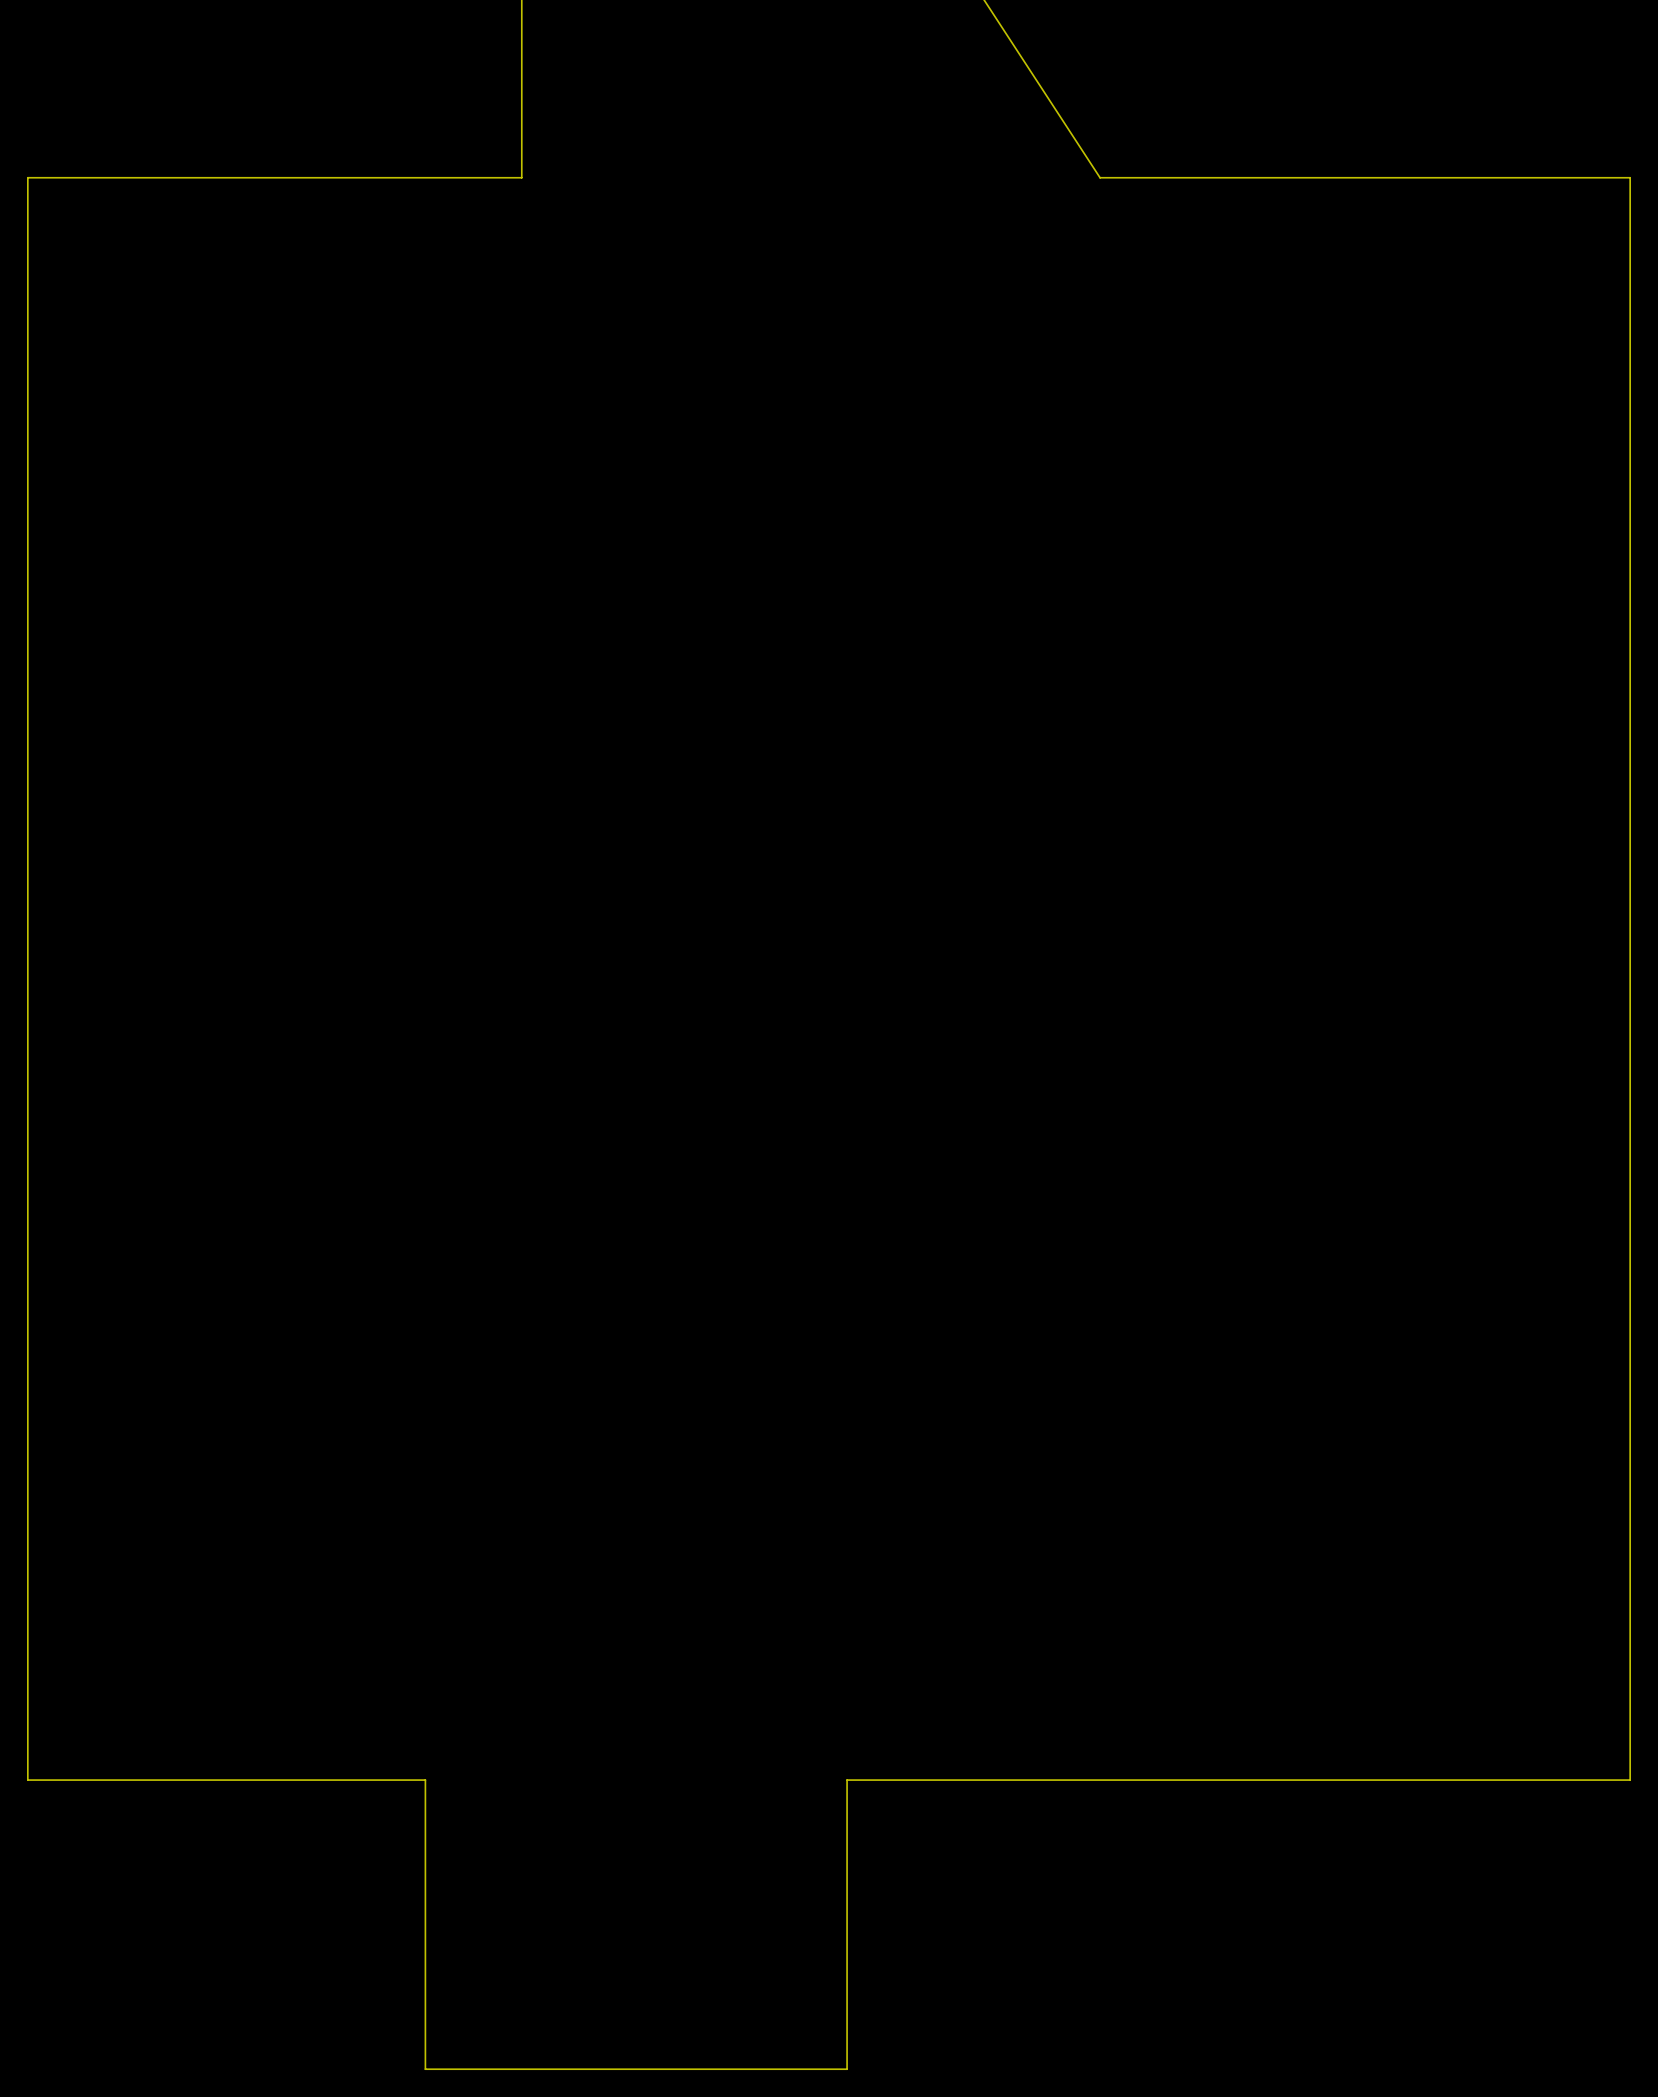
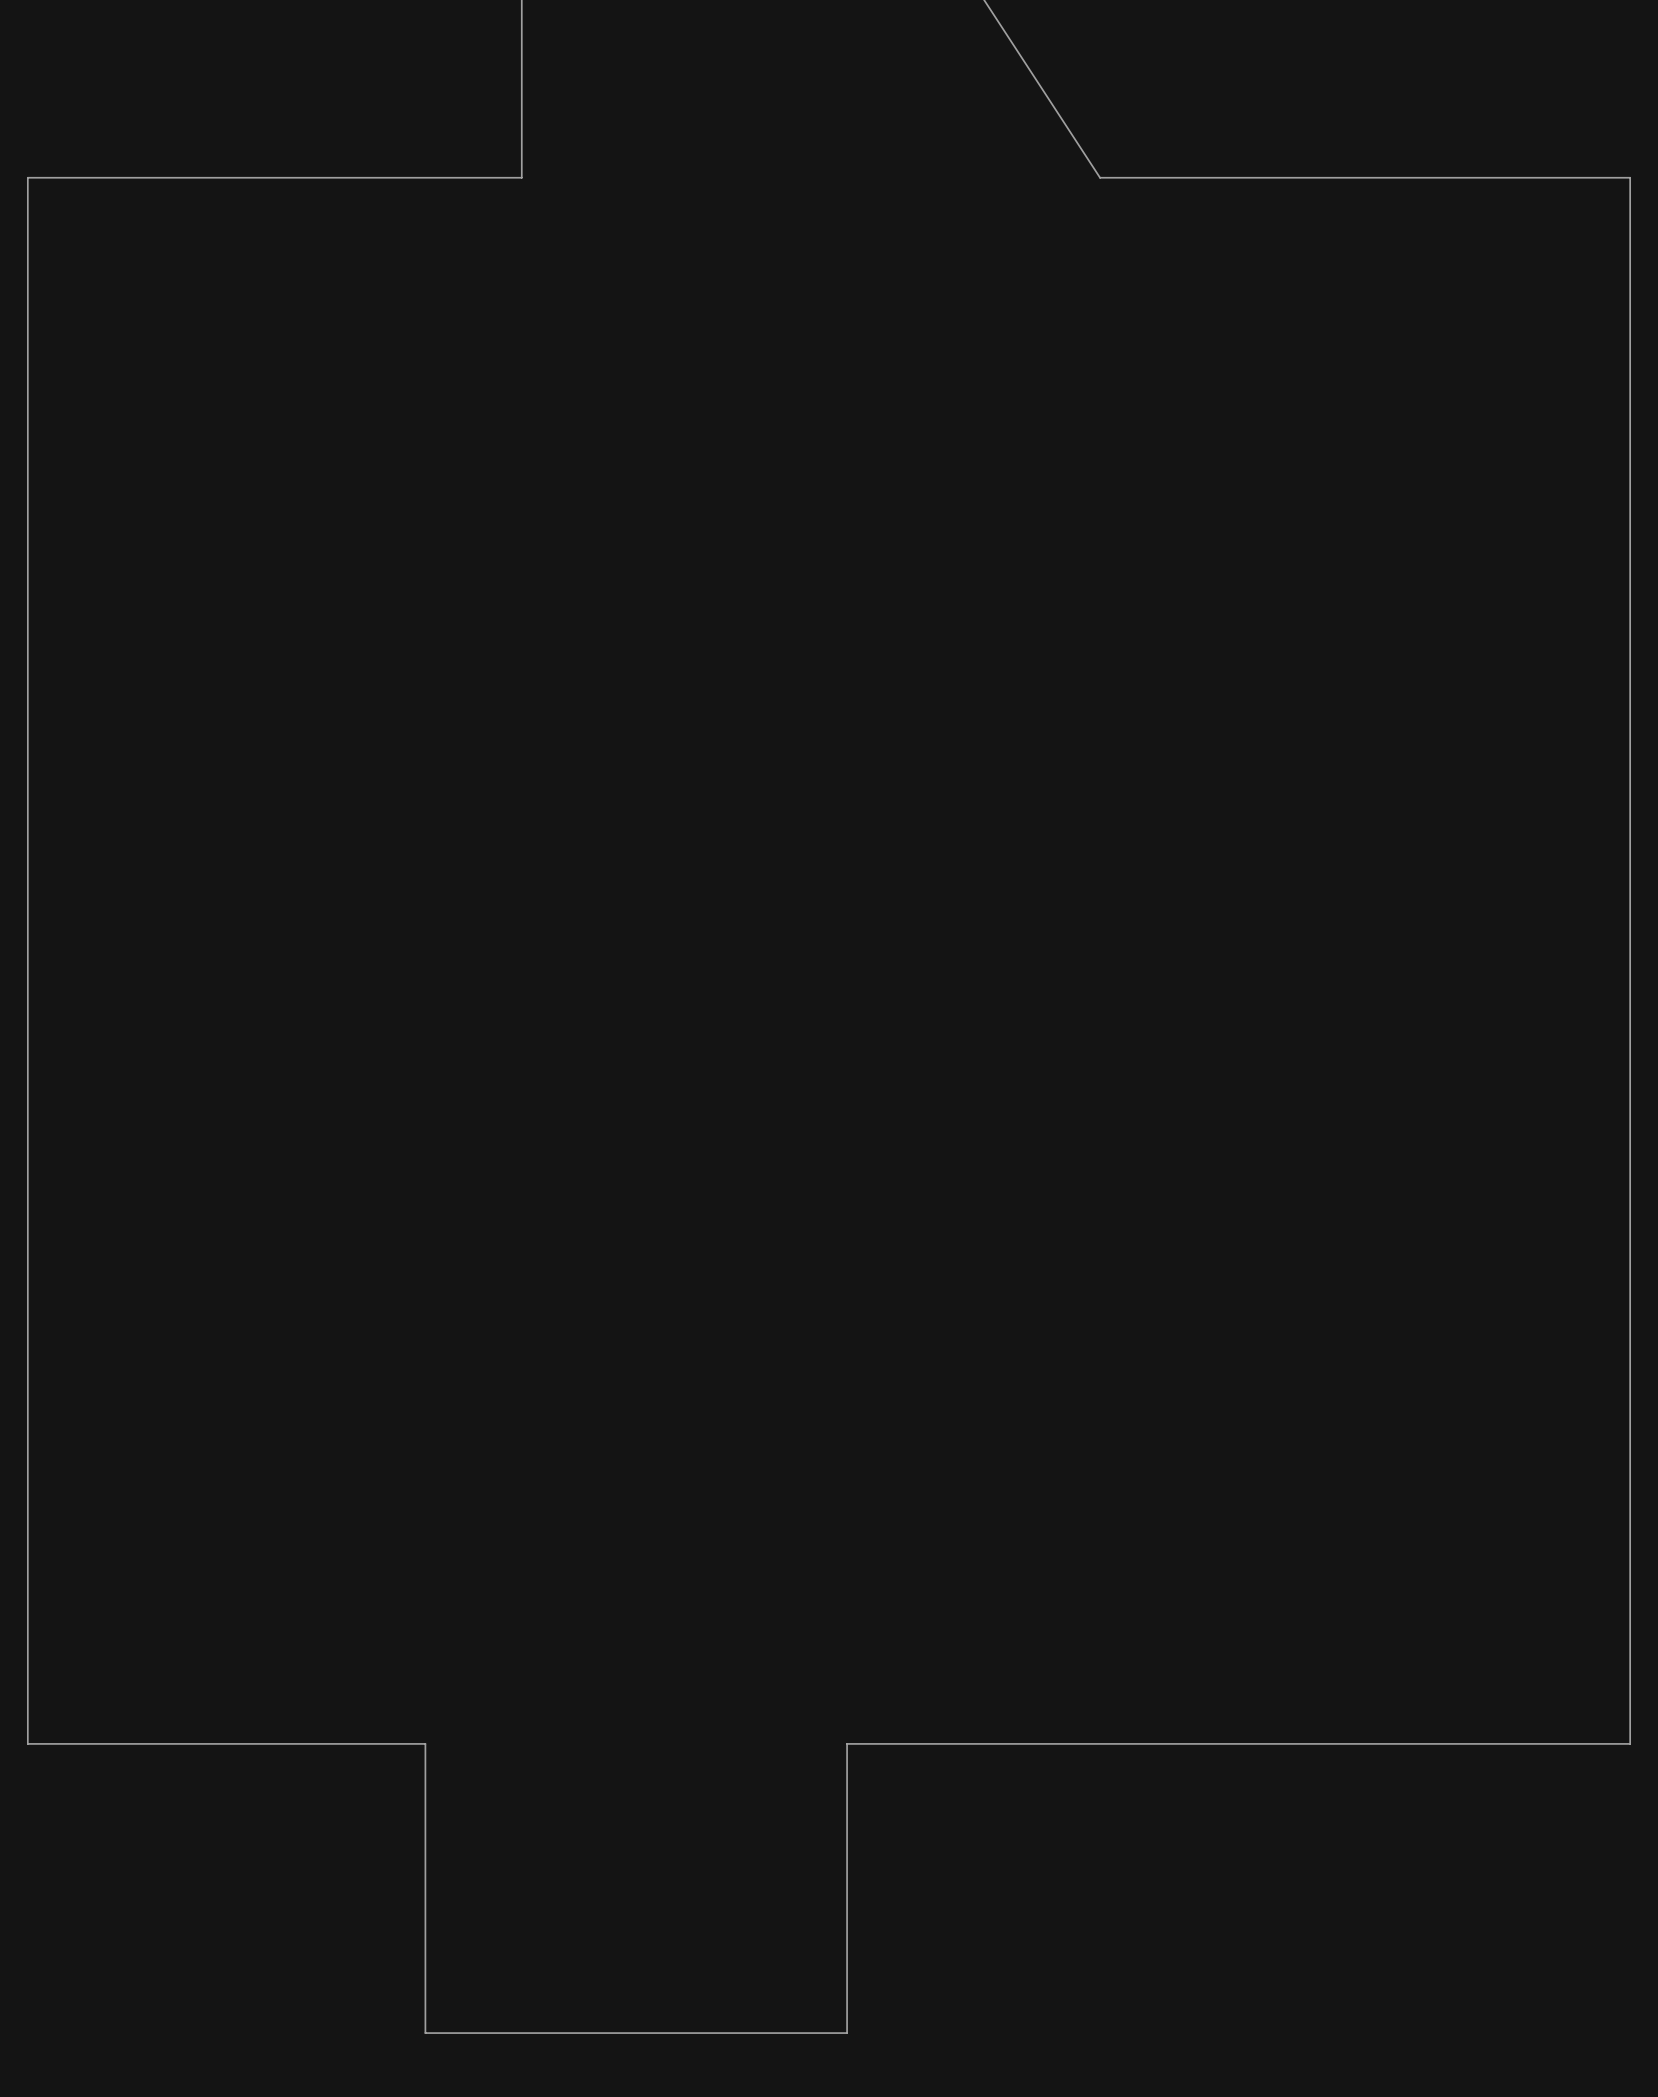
board edge: (27, 1743) (27, 1780) (425, 1780) -> (27, 1743) (425, 1743) (425, 1780)
board edge: (1630, 1743) (1630, 1780) (847, 1780) -> (1630, 1743) (847, 1743) (847, 1780)
board edge: (847, 2033) (847, 2069) (425, 2069) (425, 2033) -> (847, 2033) (425, 2033)

